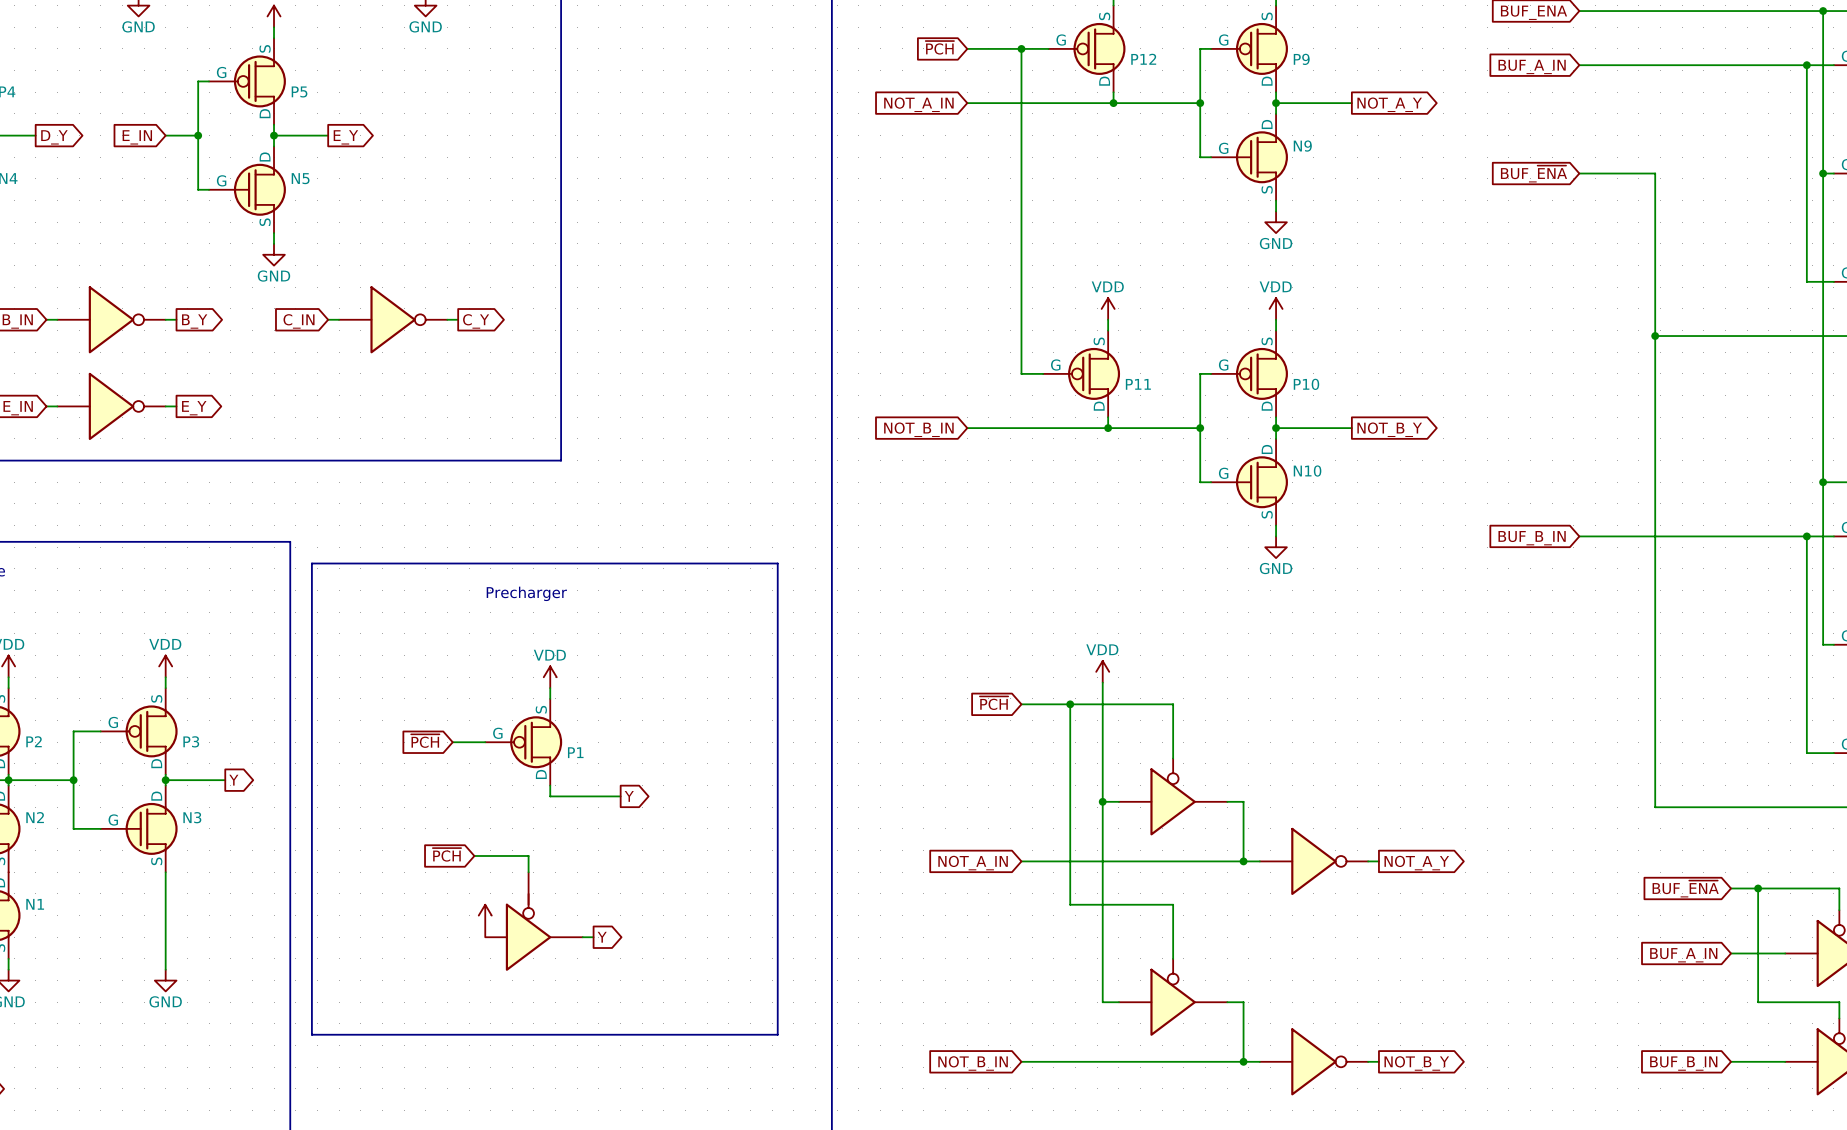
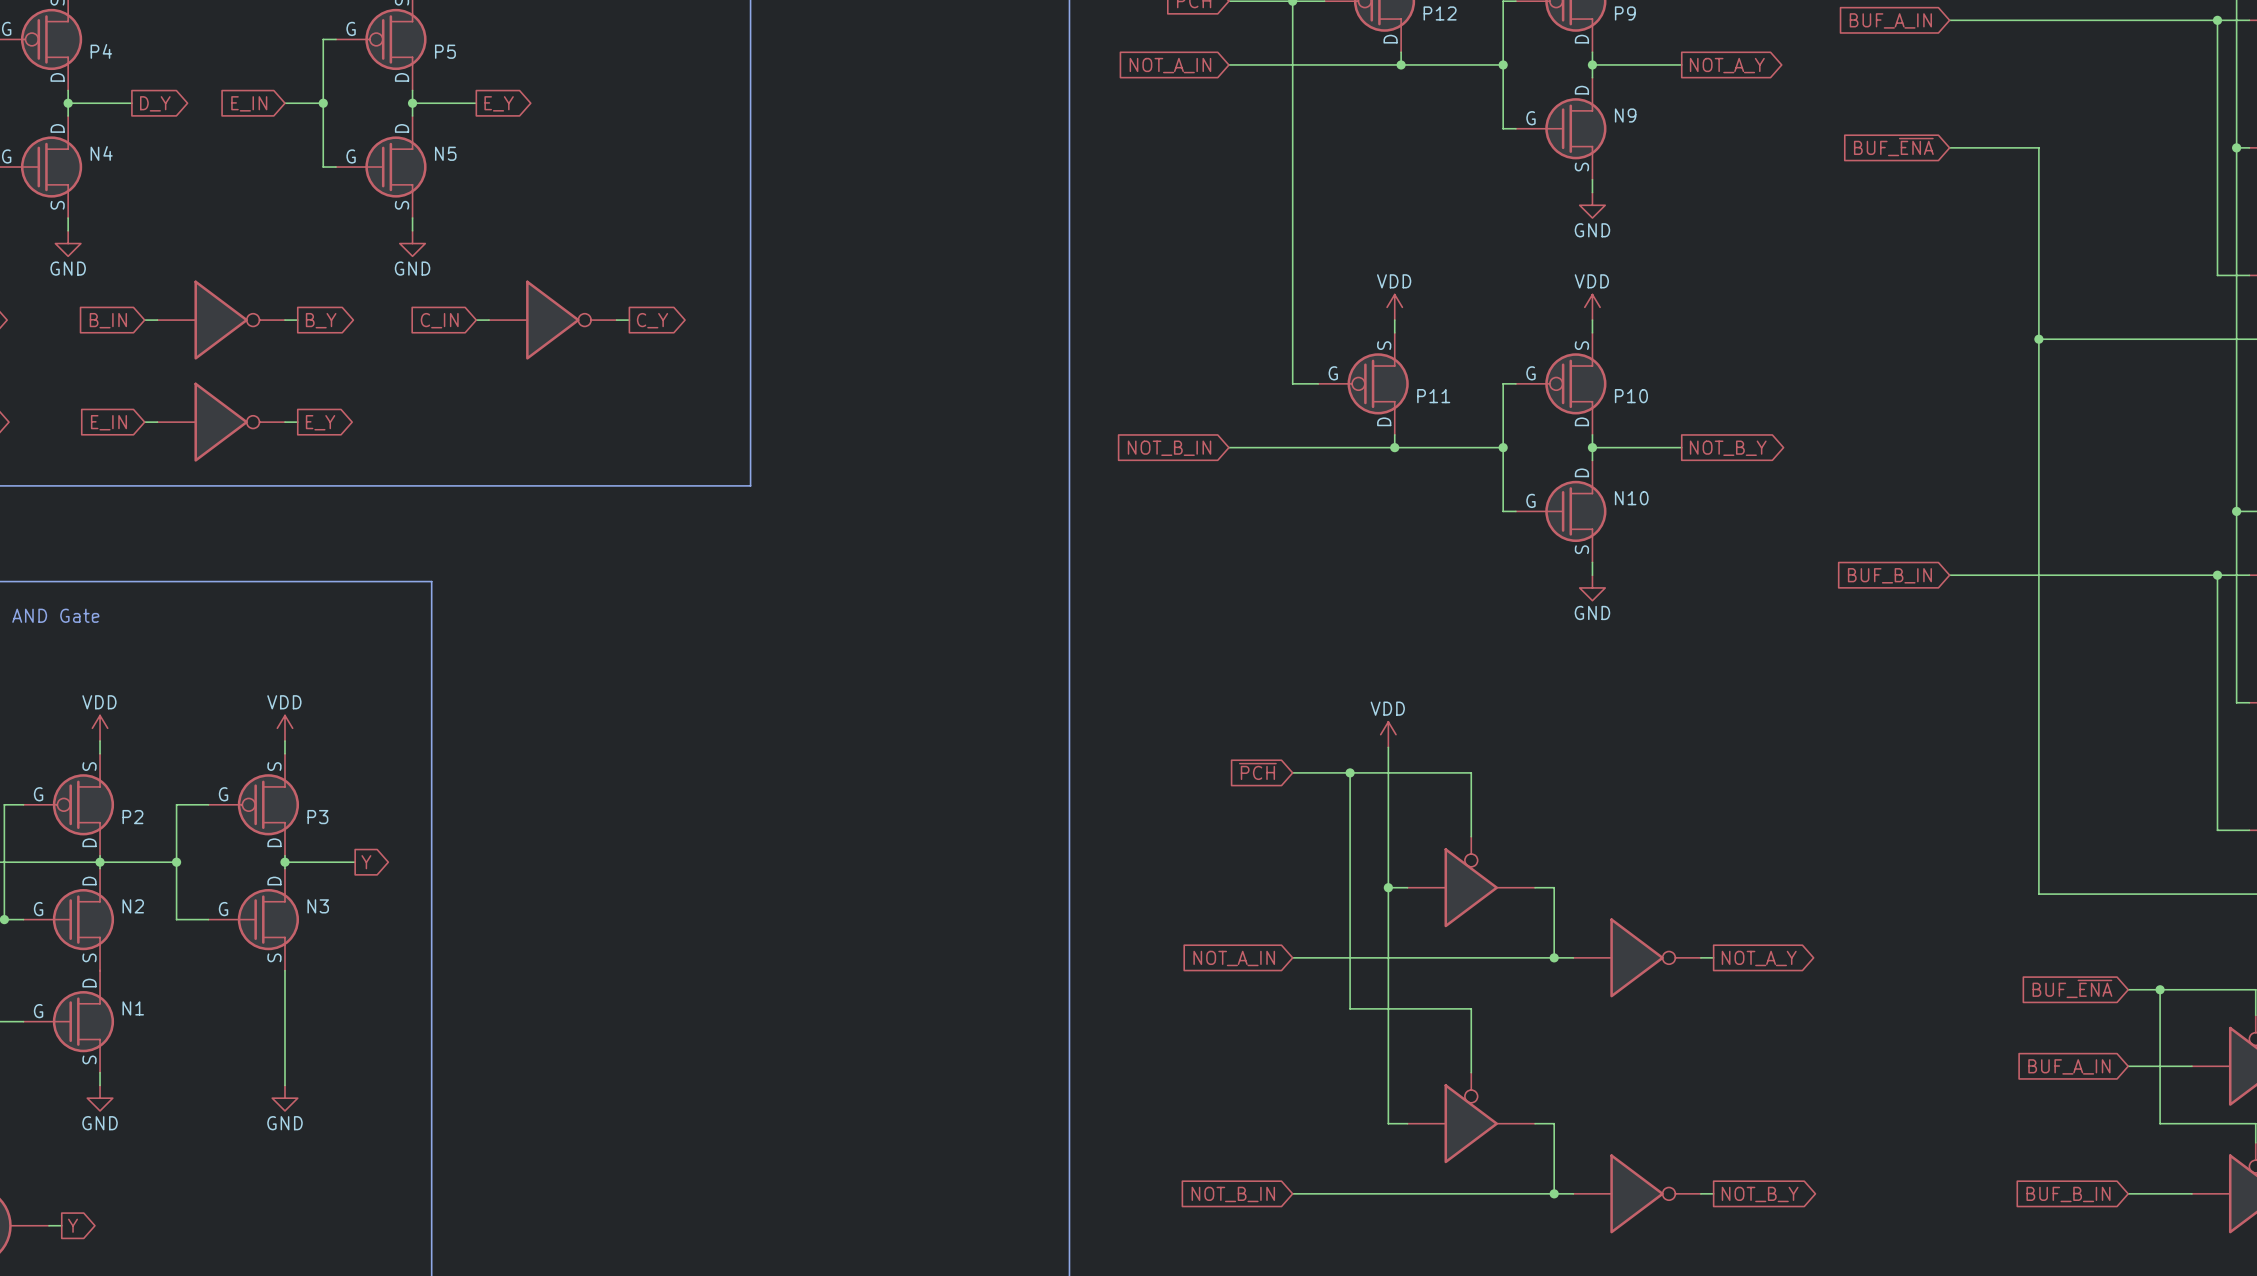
line: (311, 563) (777, 563) (777, 1034) (311, 1034) (311, 563) -> none
text: Precharger (526, 593) -> none
power symbol: VDD (550, 677) -> none
wire: (550, 688) (550, 698) -> none
global label: ~{PCH} (425, 741) -> none
wire: (452, 742) (485, 742) -> none
P1: (523, 742) -> none
wire: (550, 785) (550, 796) (620, 796) -> none
global label: Y (629, 796) -> none
global label: ~{PCH} (446, 854) -> none
wire: (474, 855) (528, 855) (528, 872) -> none
part: (530, 921) -> none
wire: (582, 937) (593, 937) -> none
global label: Y (602, 937) -> none

